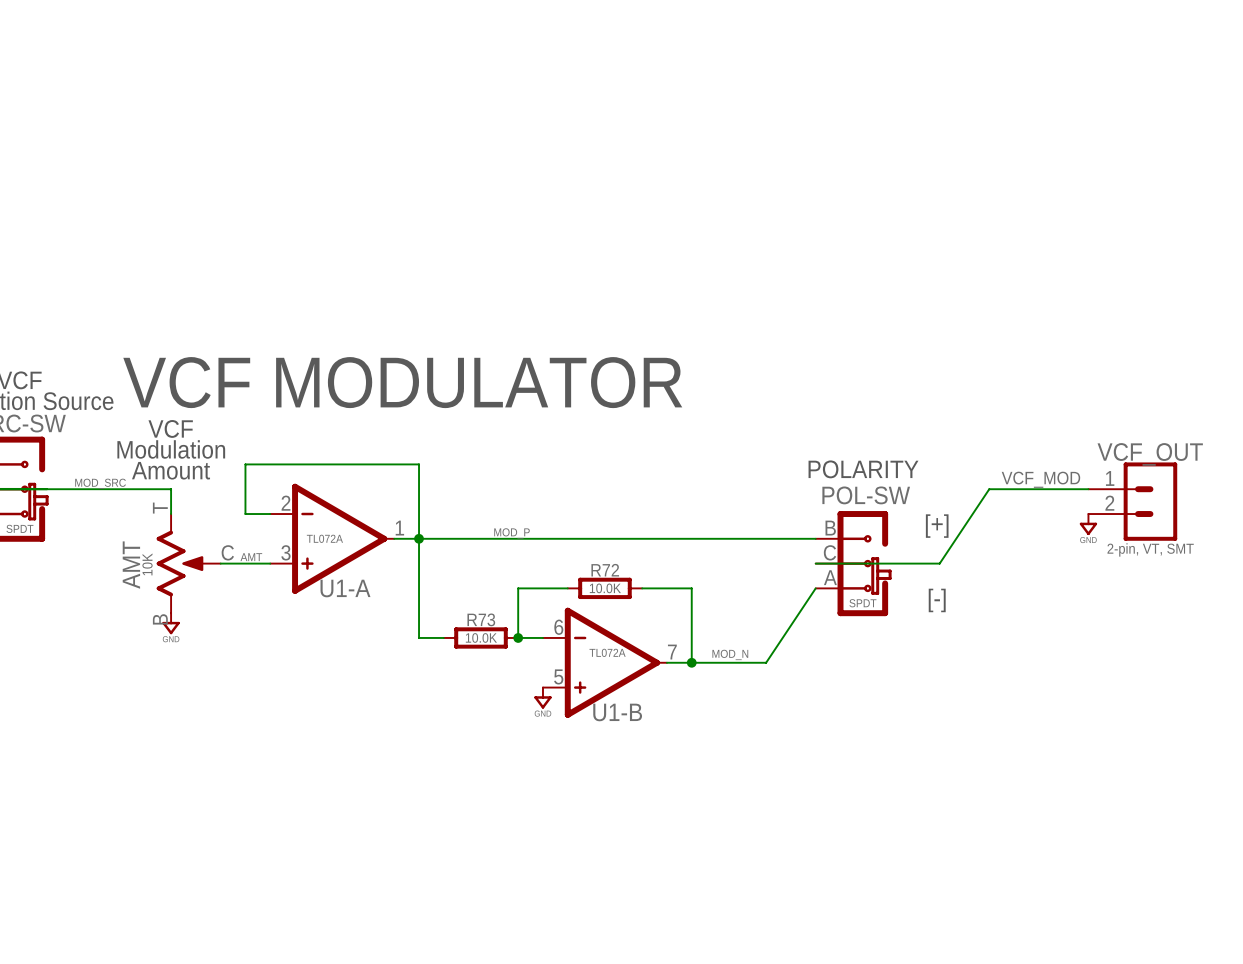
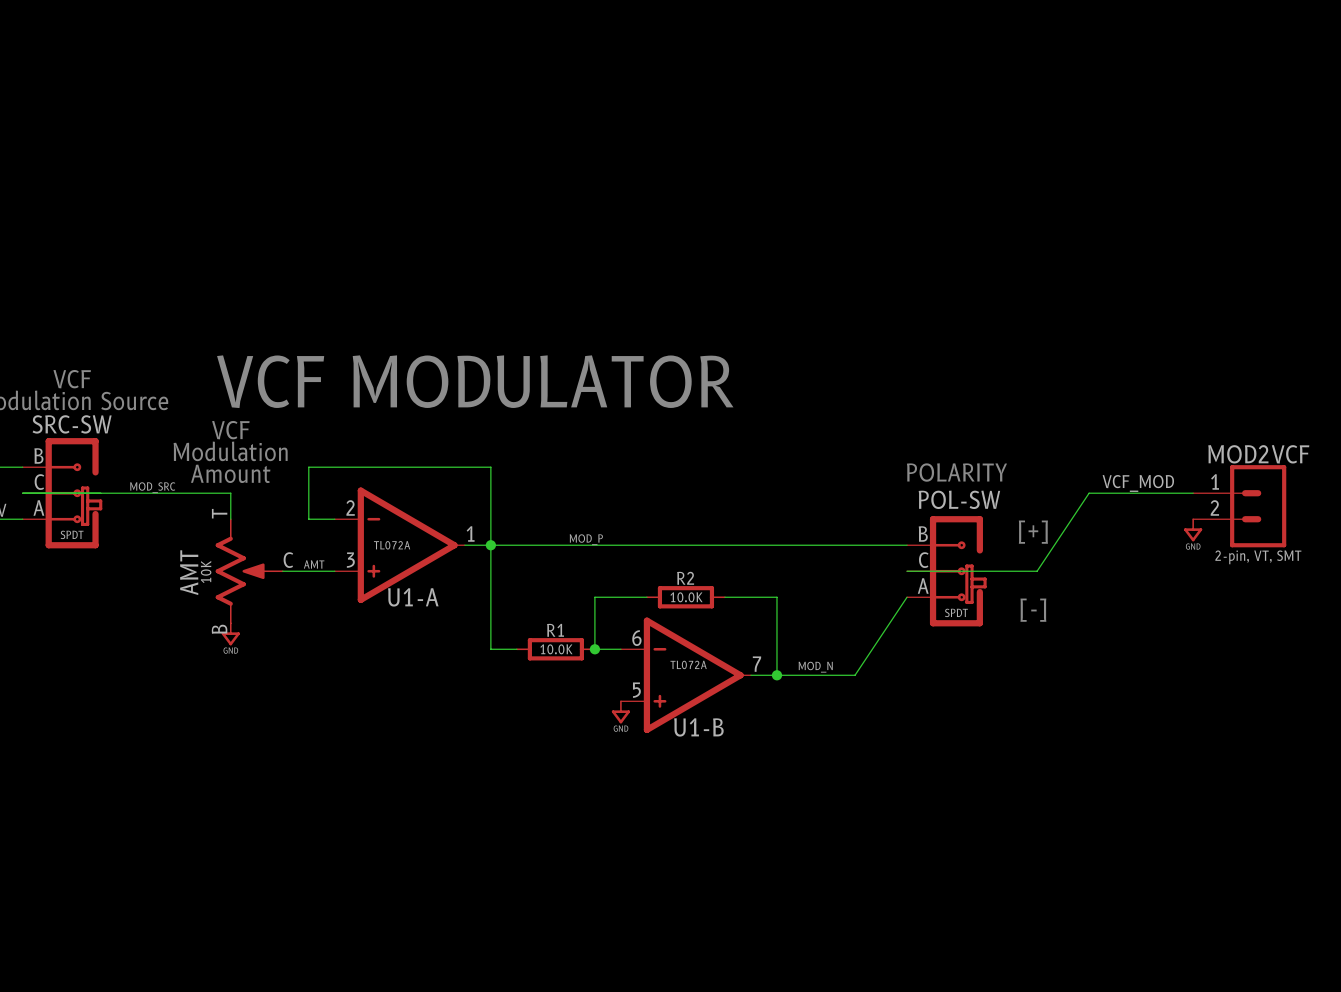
VCF_OUT name: VCF_OUT (1150, 454) -> MOD2VCF (1258, 454)
R72 name: R72 (605, 570) -> R2 (685, 578)
R73 name: R73 (481, 619) -> R1 (555, 630)

